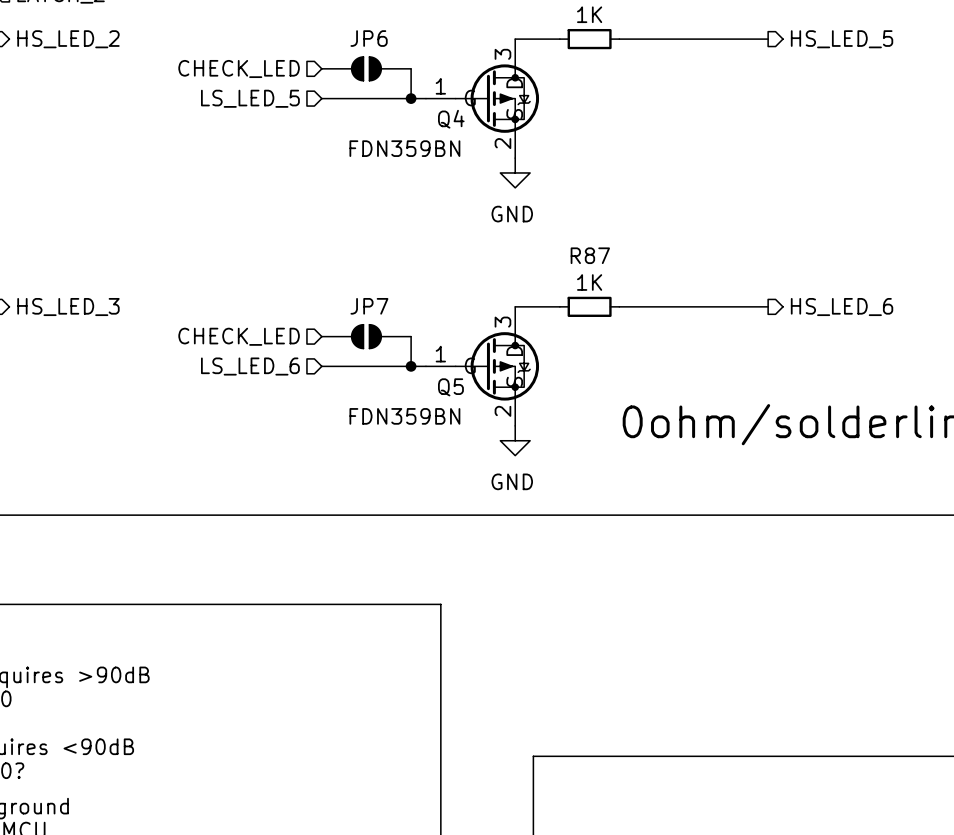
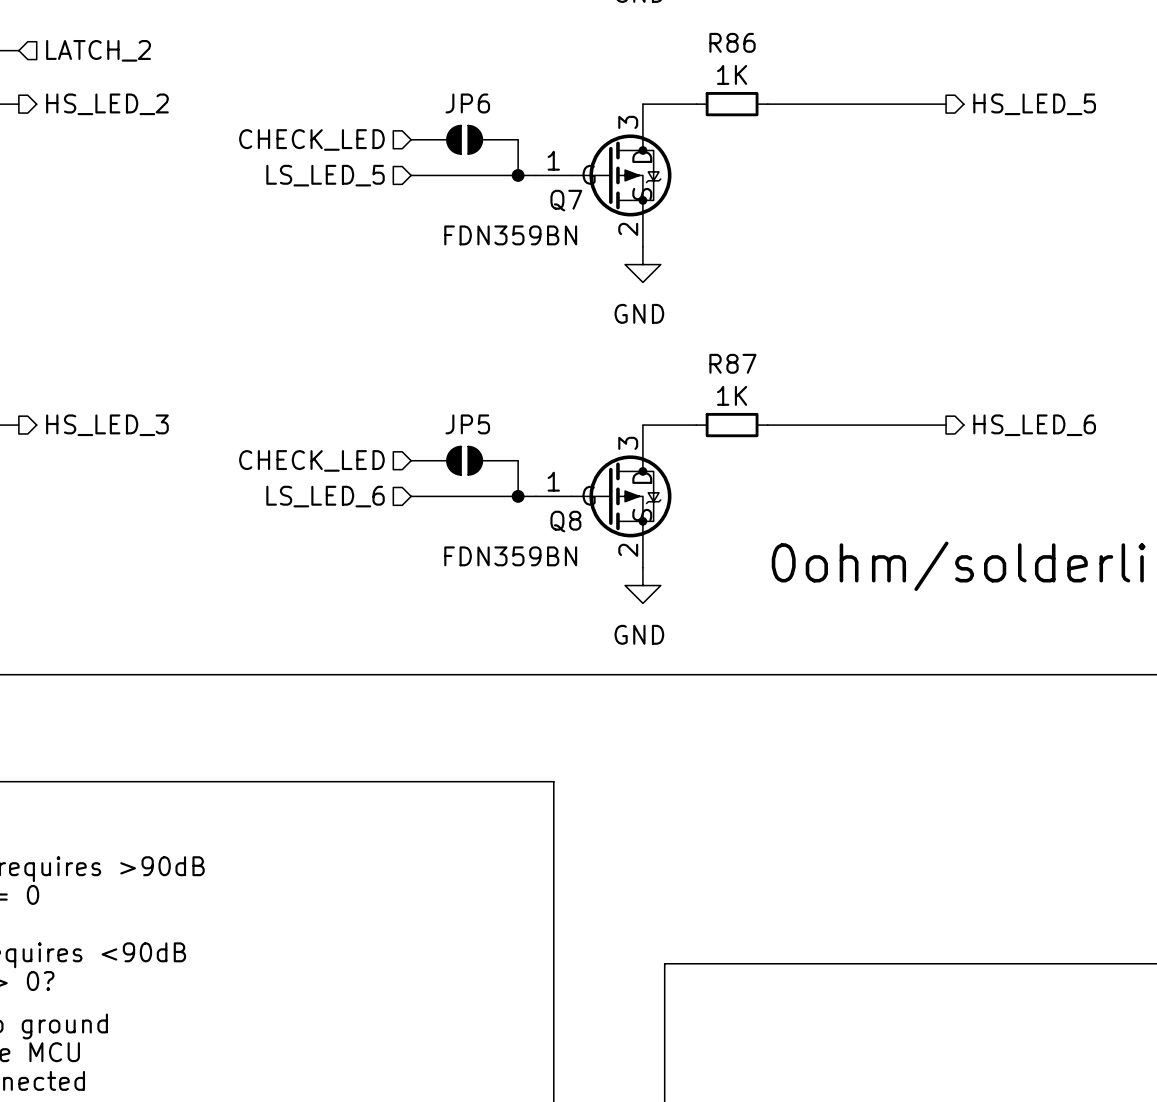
Q4 name: Q4 (451, 119) -> Q7 (566, 200)
JP7 name: JP7 (369, 306) -> JP5 (467, 424)
Q5 name: Q5 (450, 387) -> Q8 (565, 521)

